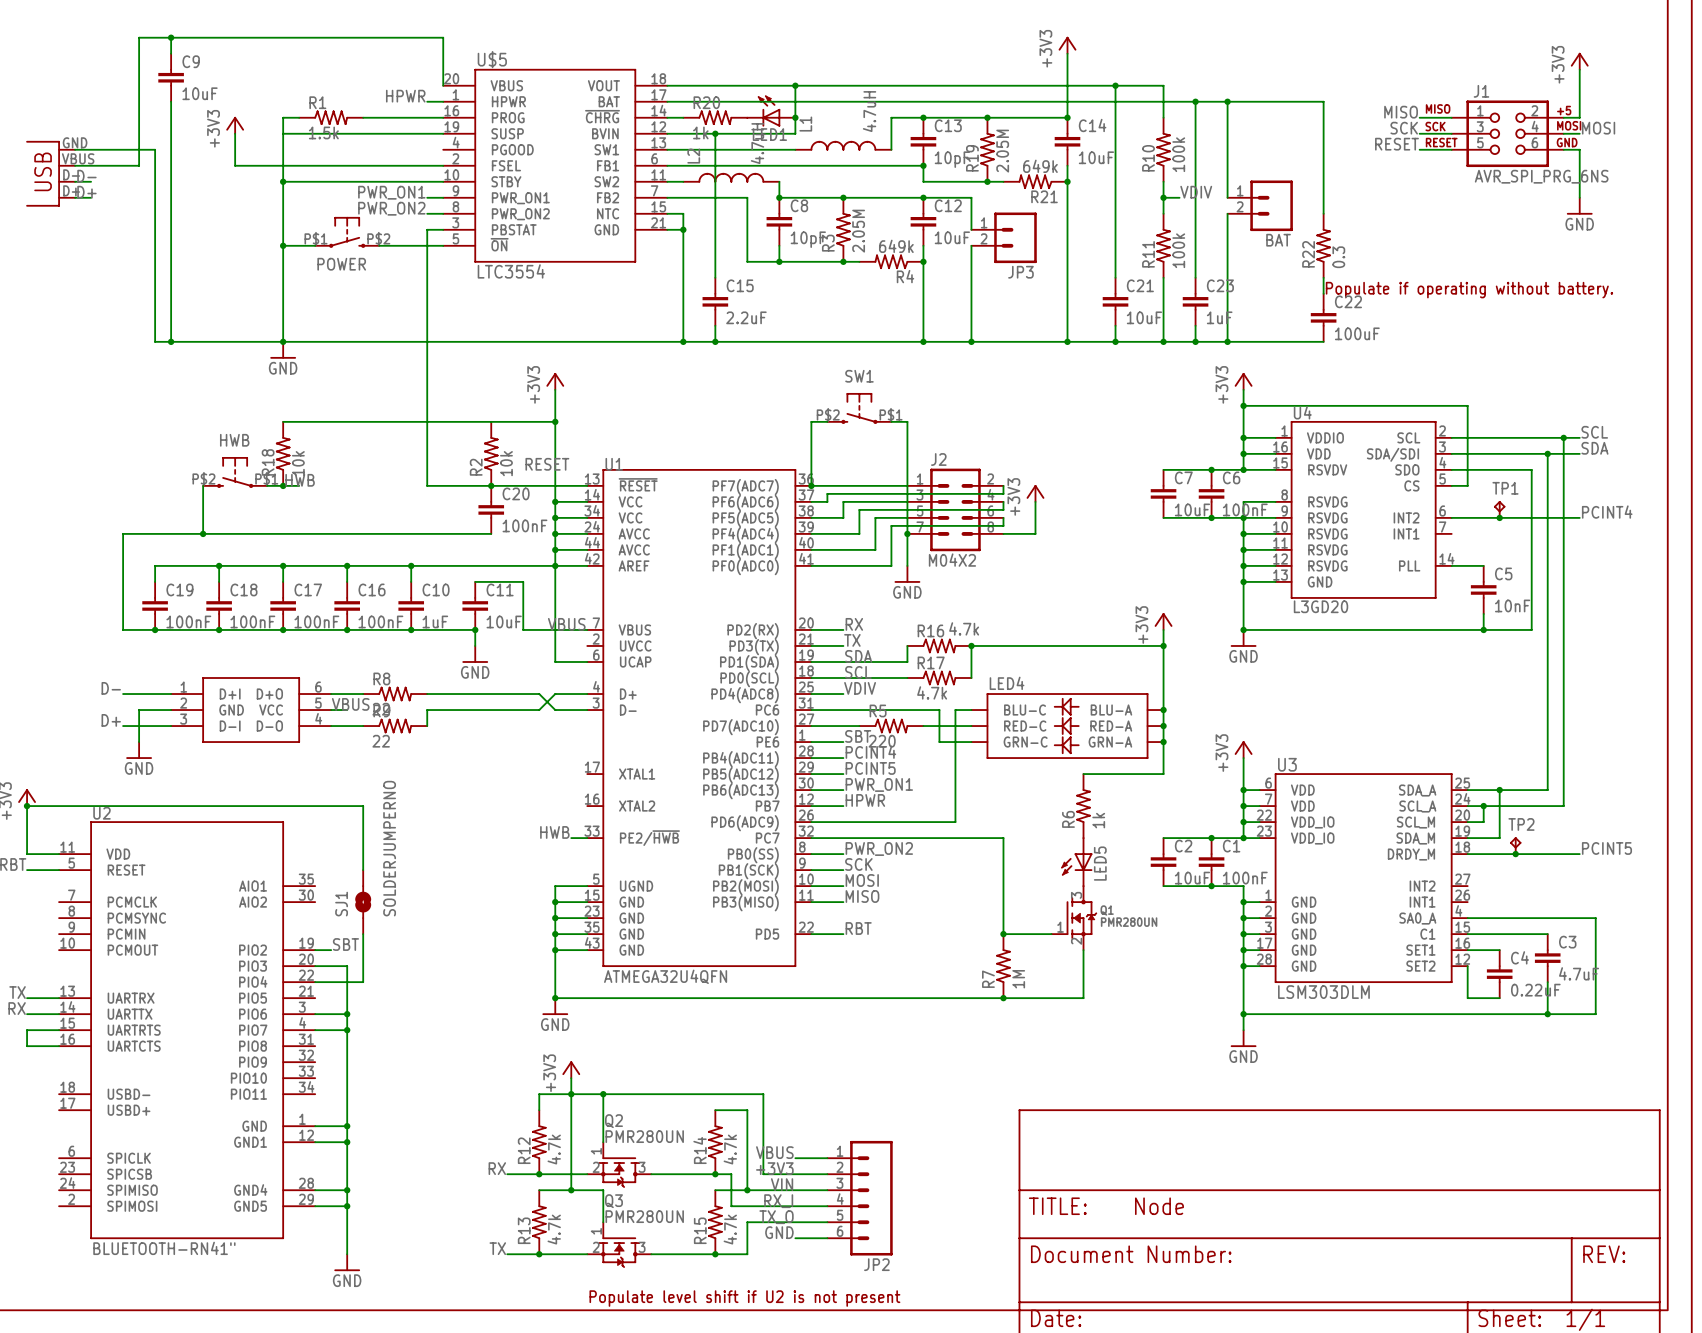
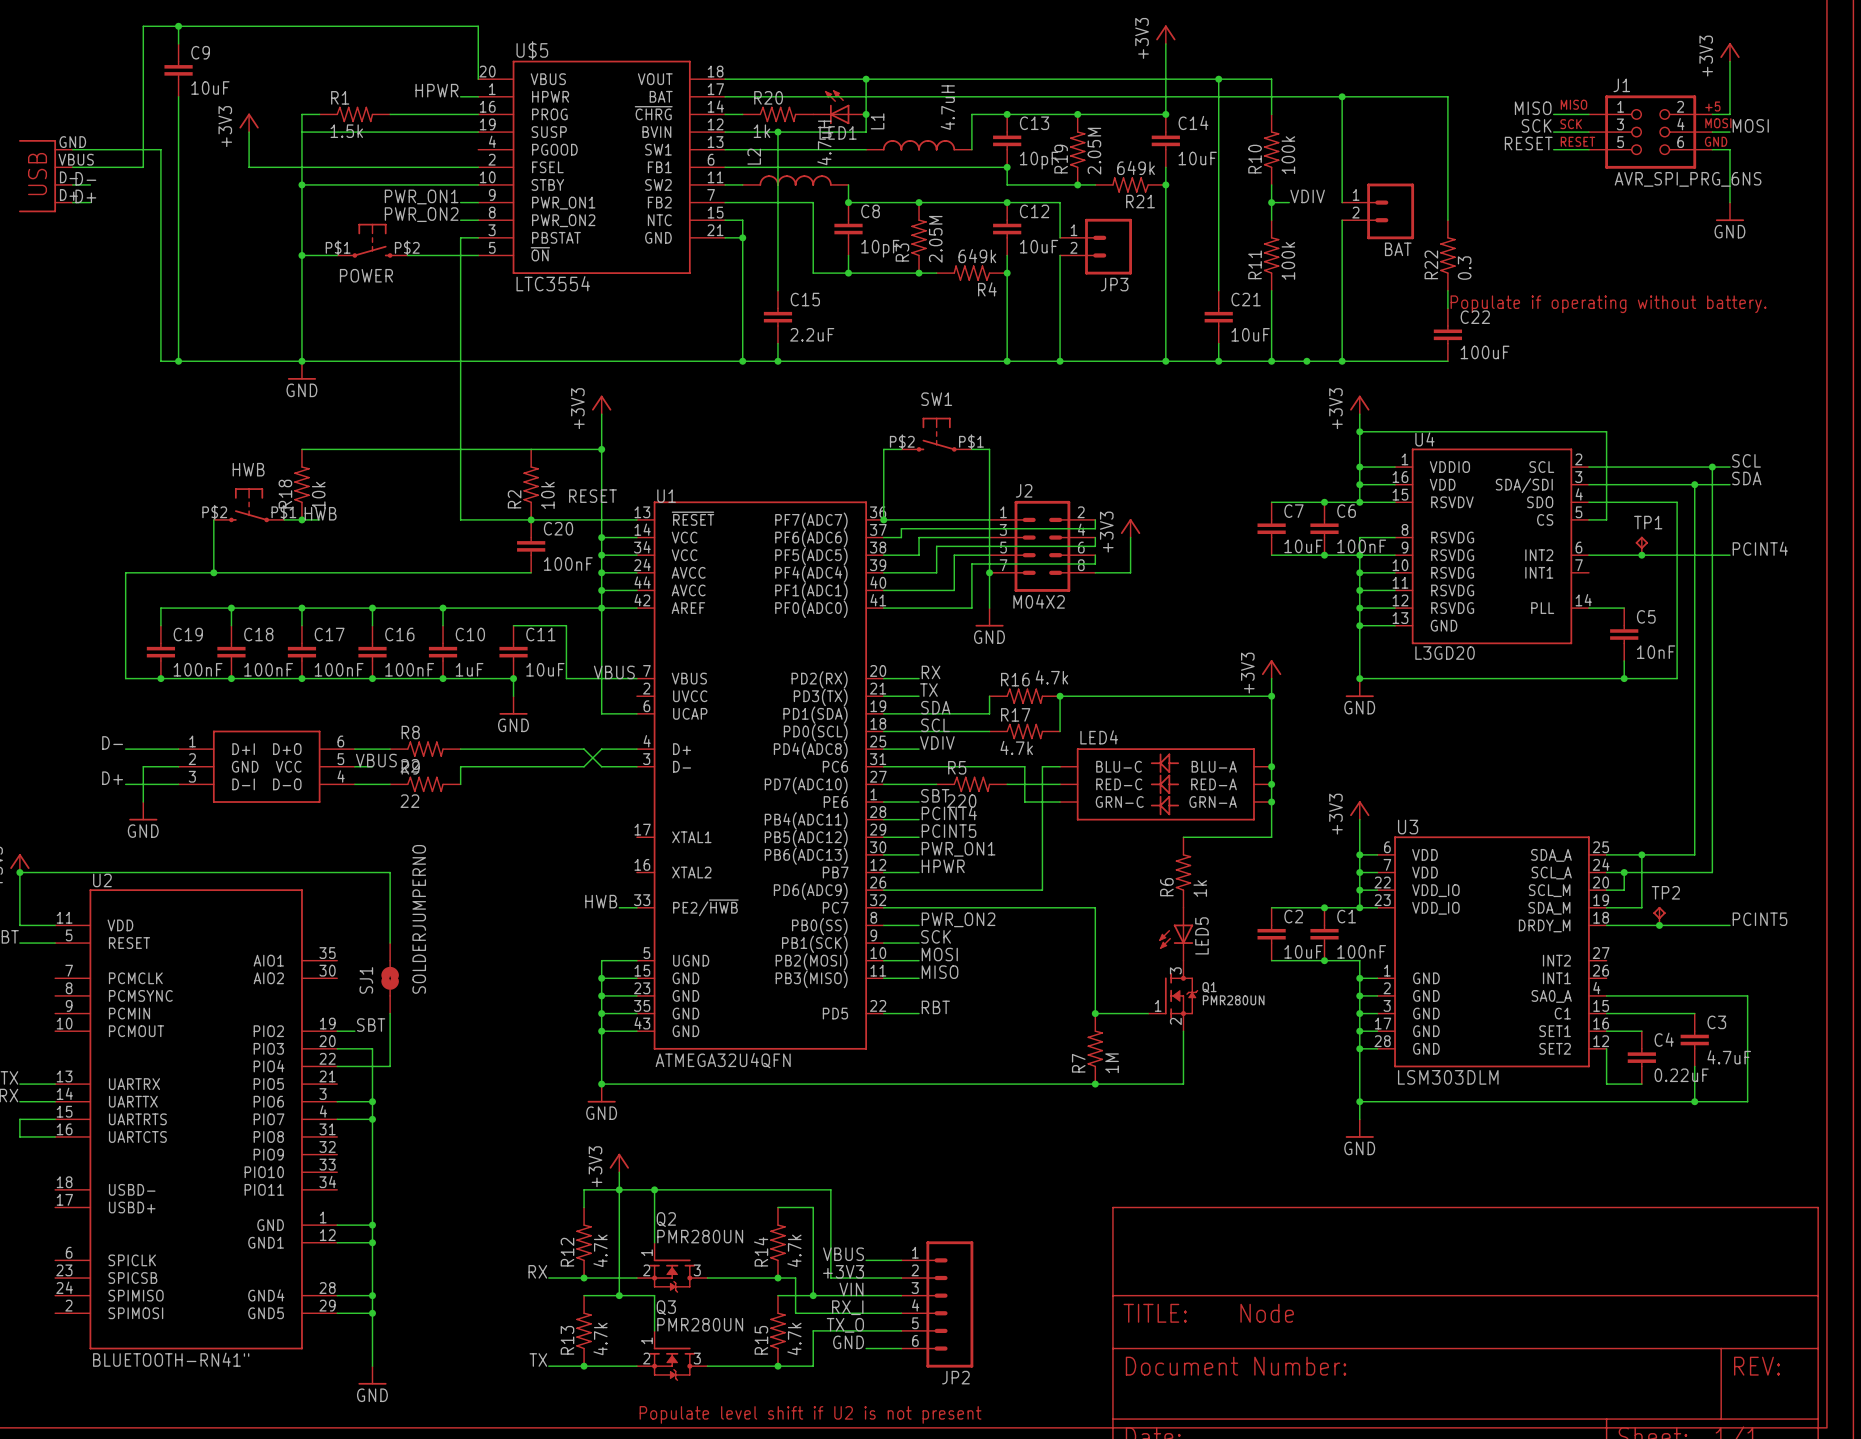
wire: (1195, 101) (1195, 277) -> none
junction: (1195, 101) -> none
C23: 1uF (1195, 301) -> none
wire: (1195, 325) (1195, 341) -> none

